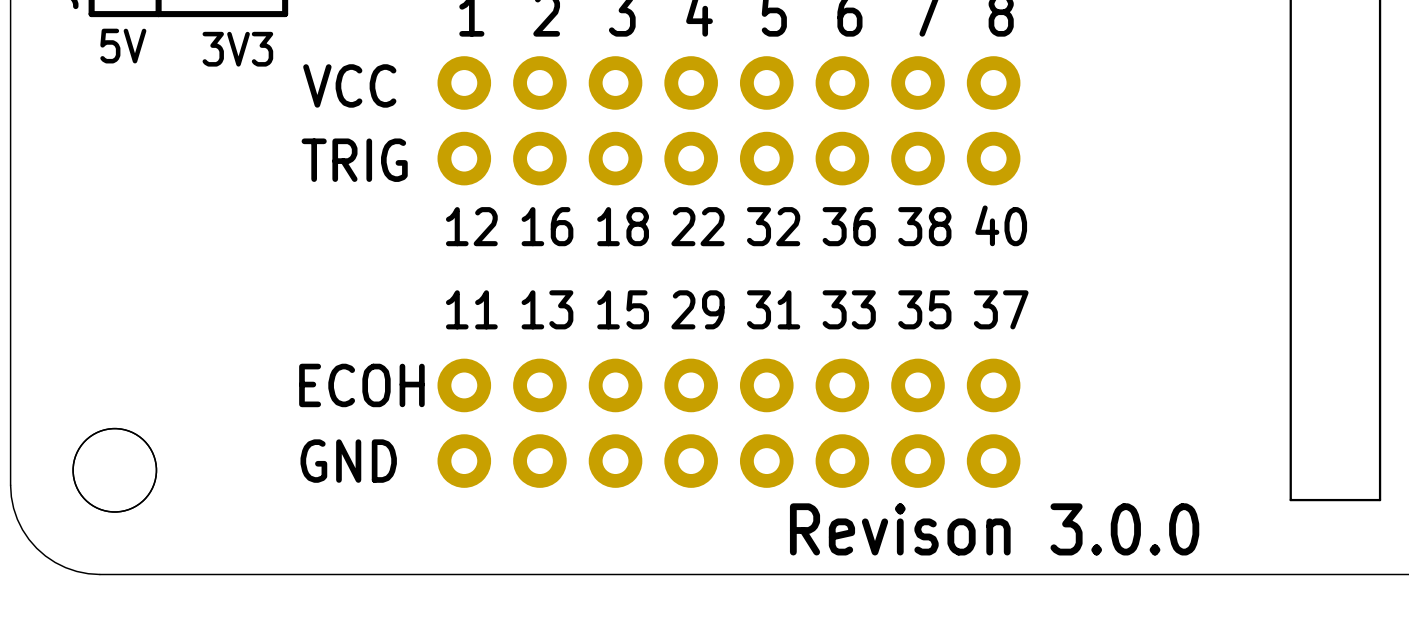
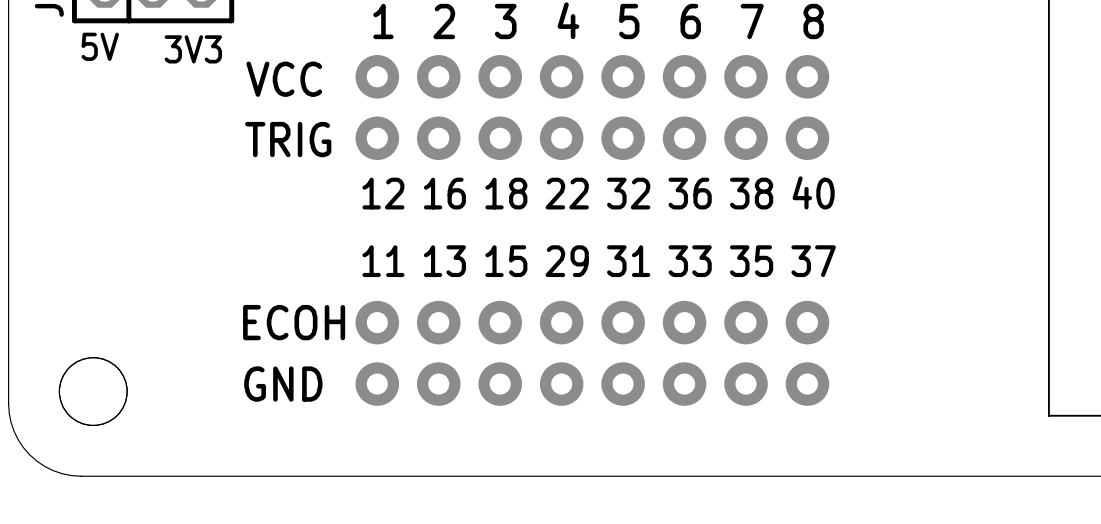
text: Revison 3.0.0 (994, 529) -> none

